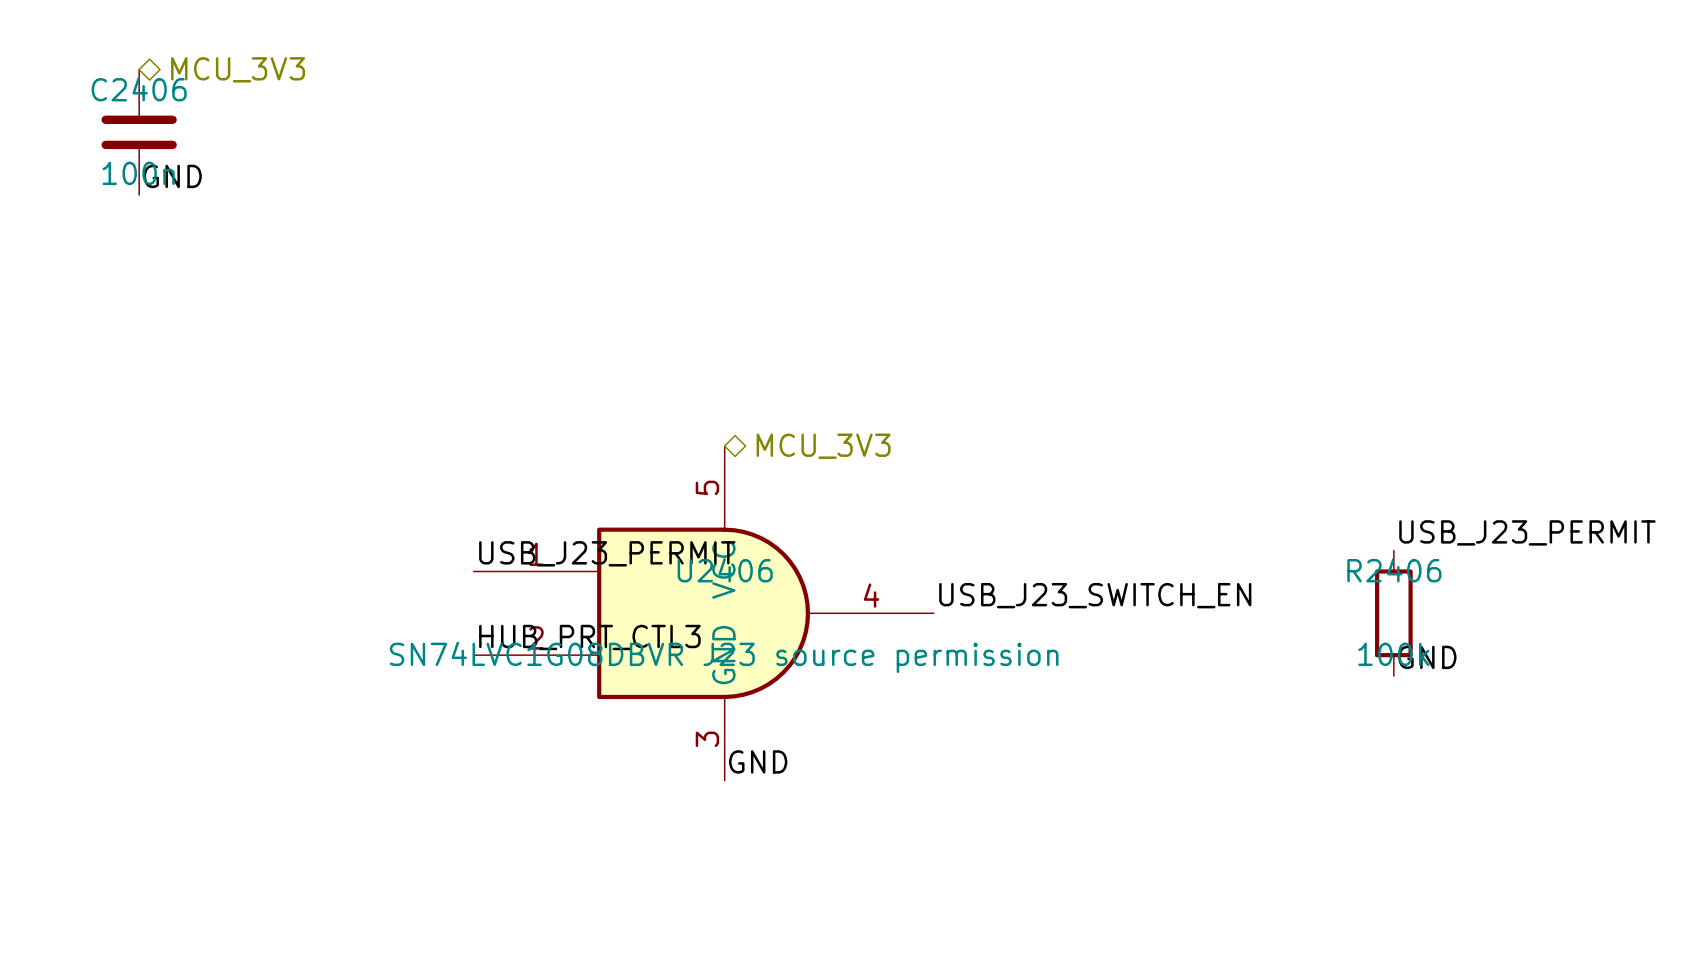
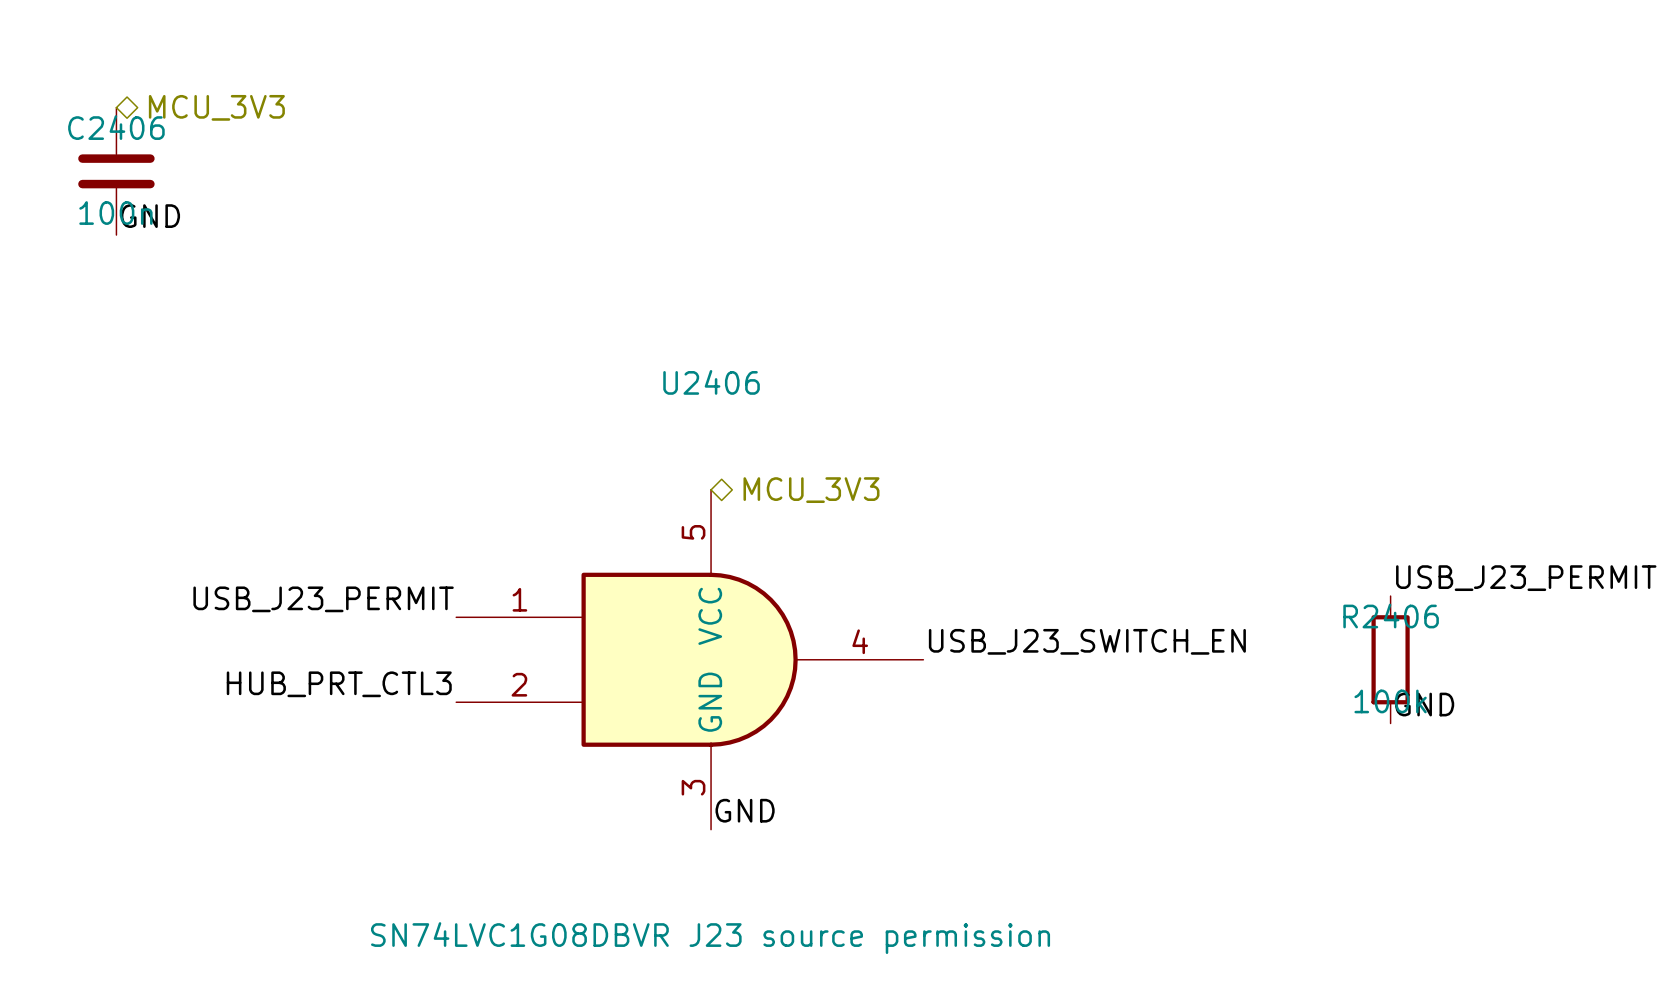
label position: USB_J23_PERMIT (607, 553) -> USB_J23_PERMIT (323, 599)
U2406 name position: U2406 (725, 570) -> U2406 (711, 382)
label position: HUB_PRT_CTL3 (589, 637) -> HUB_PRT_CTL3 (339, 684)
U2406 value position: SN74LVC1G08DBVR J23 source permission (724, 657) -> SN74LVC1G08DBVR J23 source permission (710, 938)

